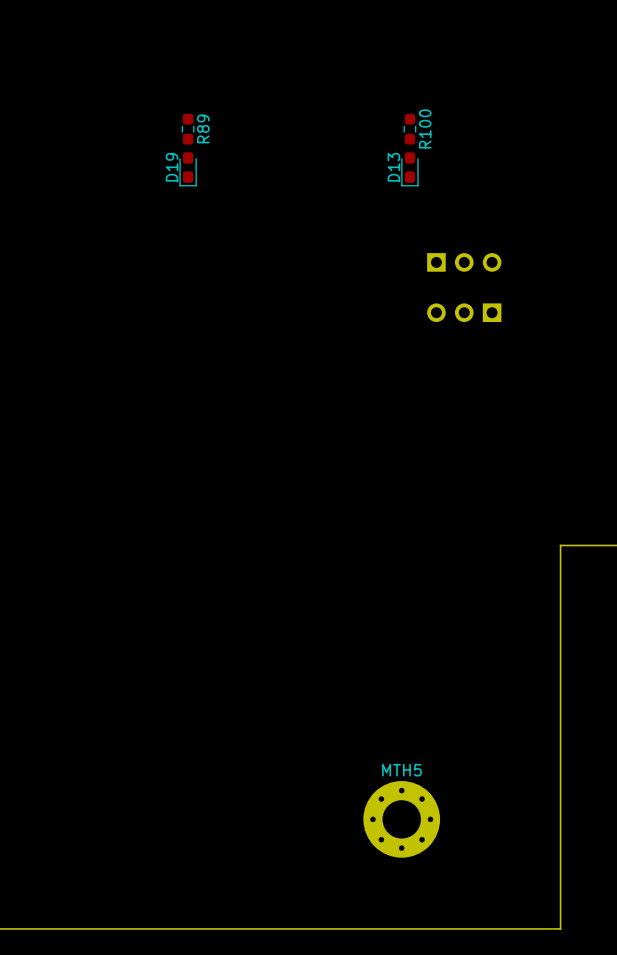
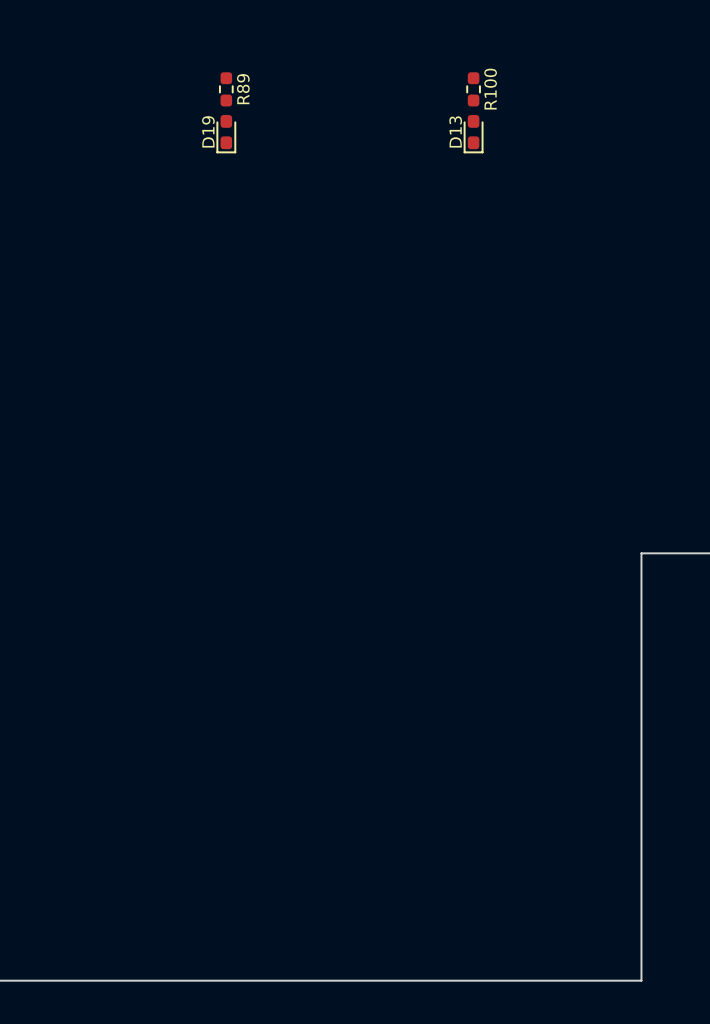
part: (464, 262) -> none
part: (464, 312) -> none
MTH5: (401, 819) -> none

